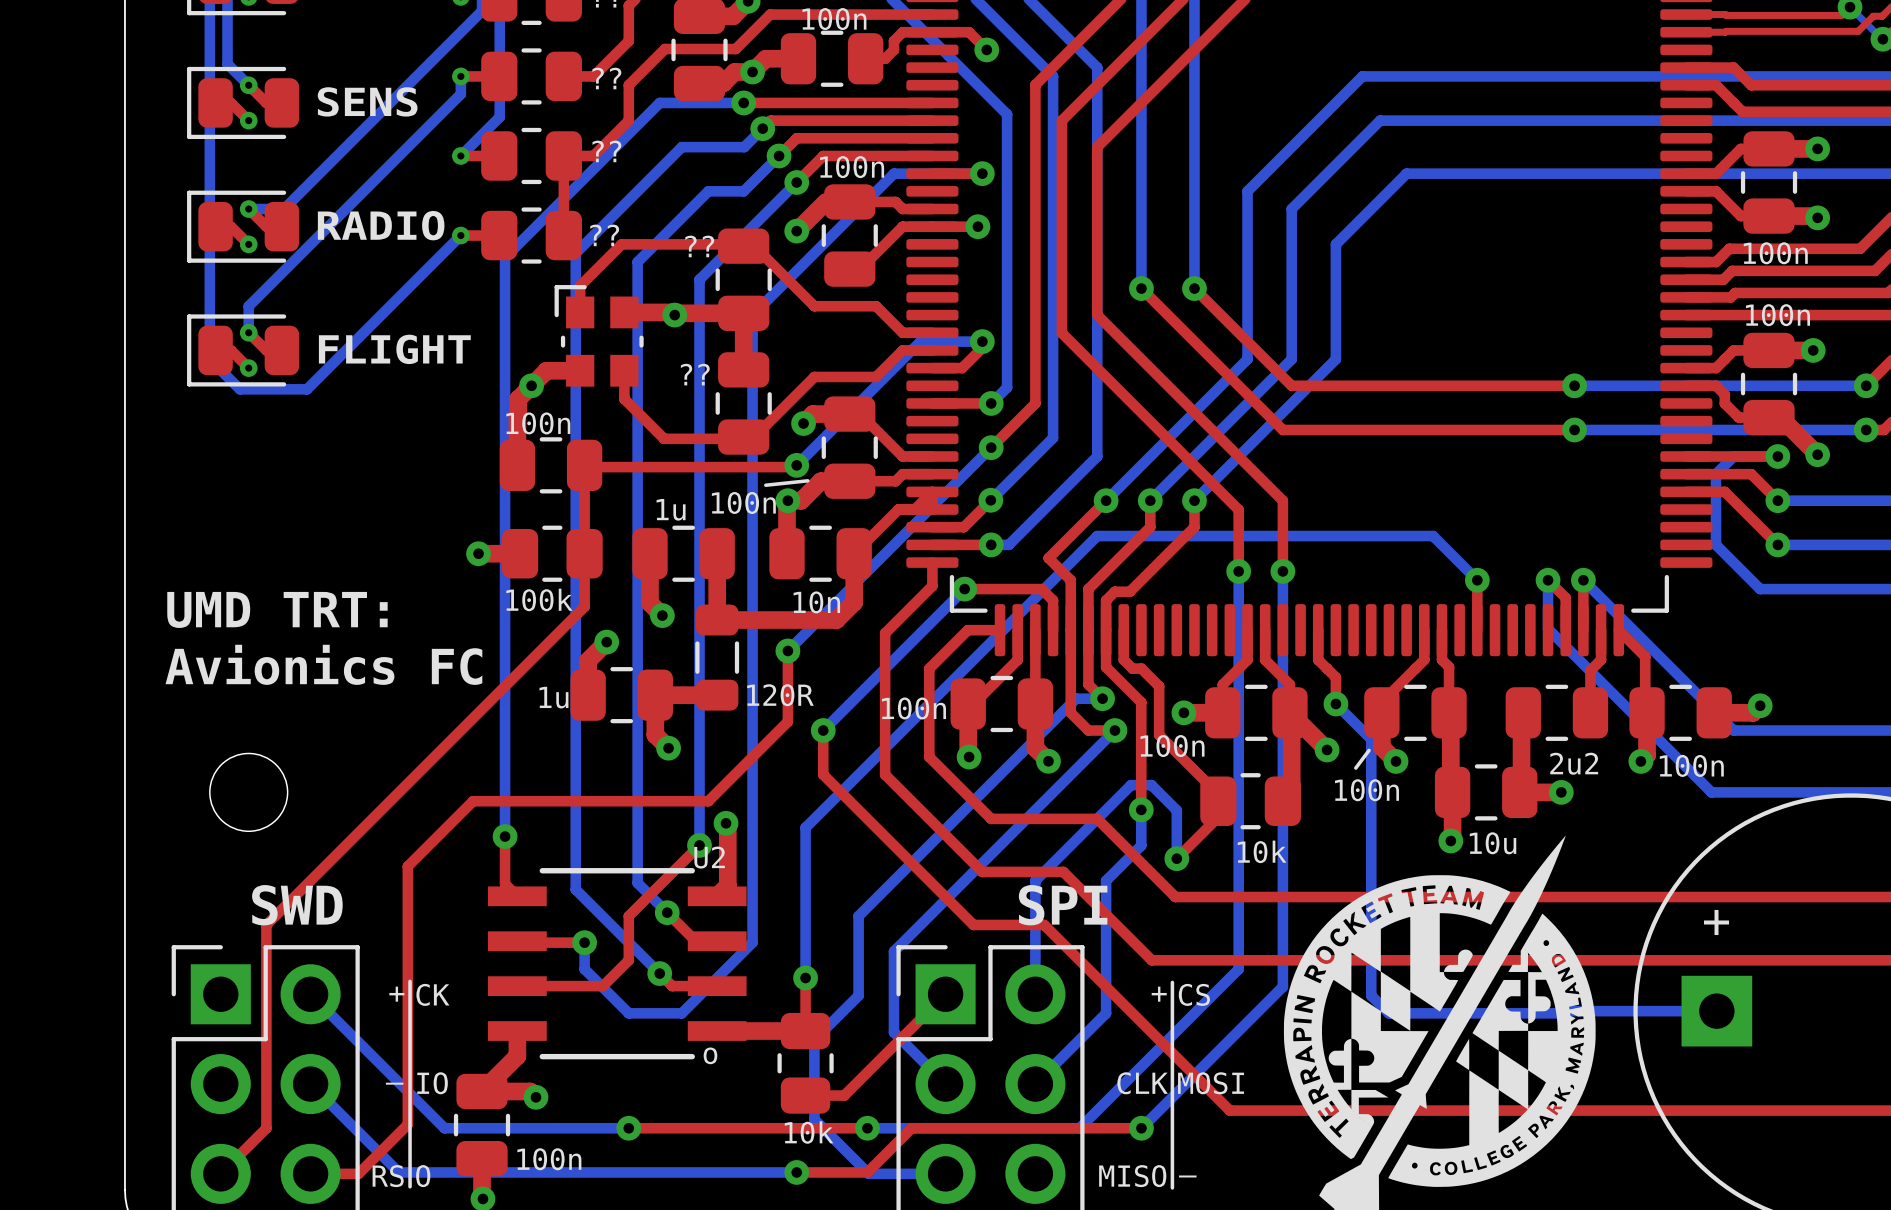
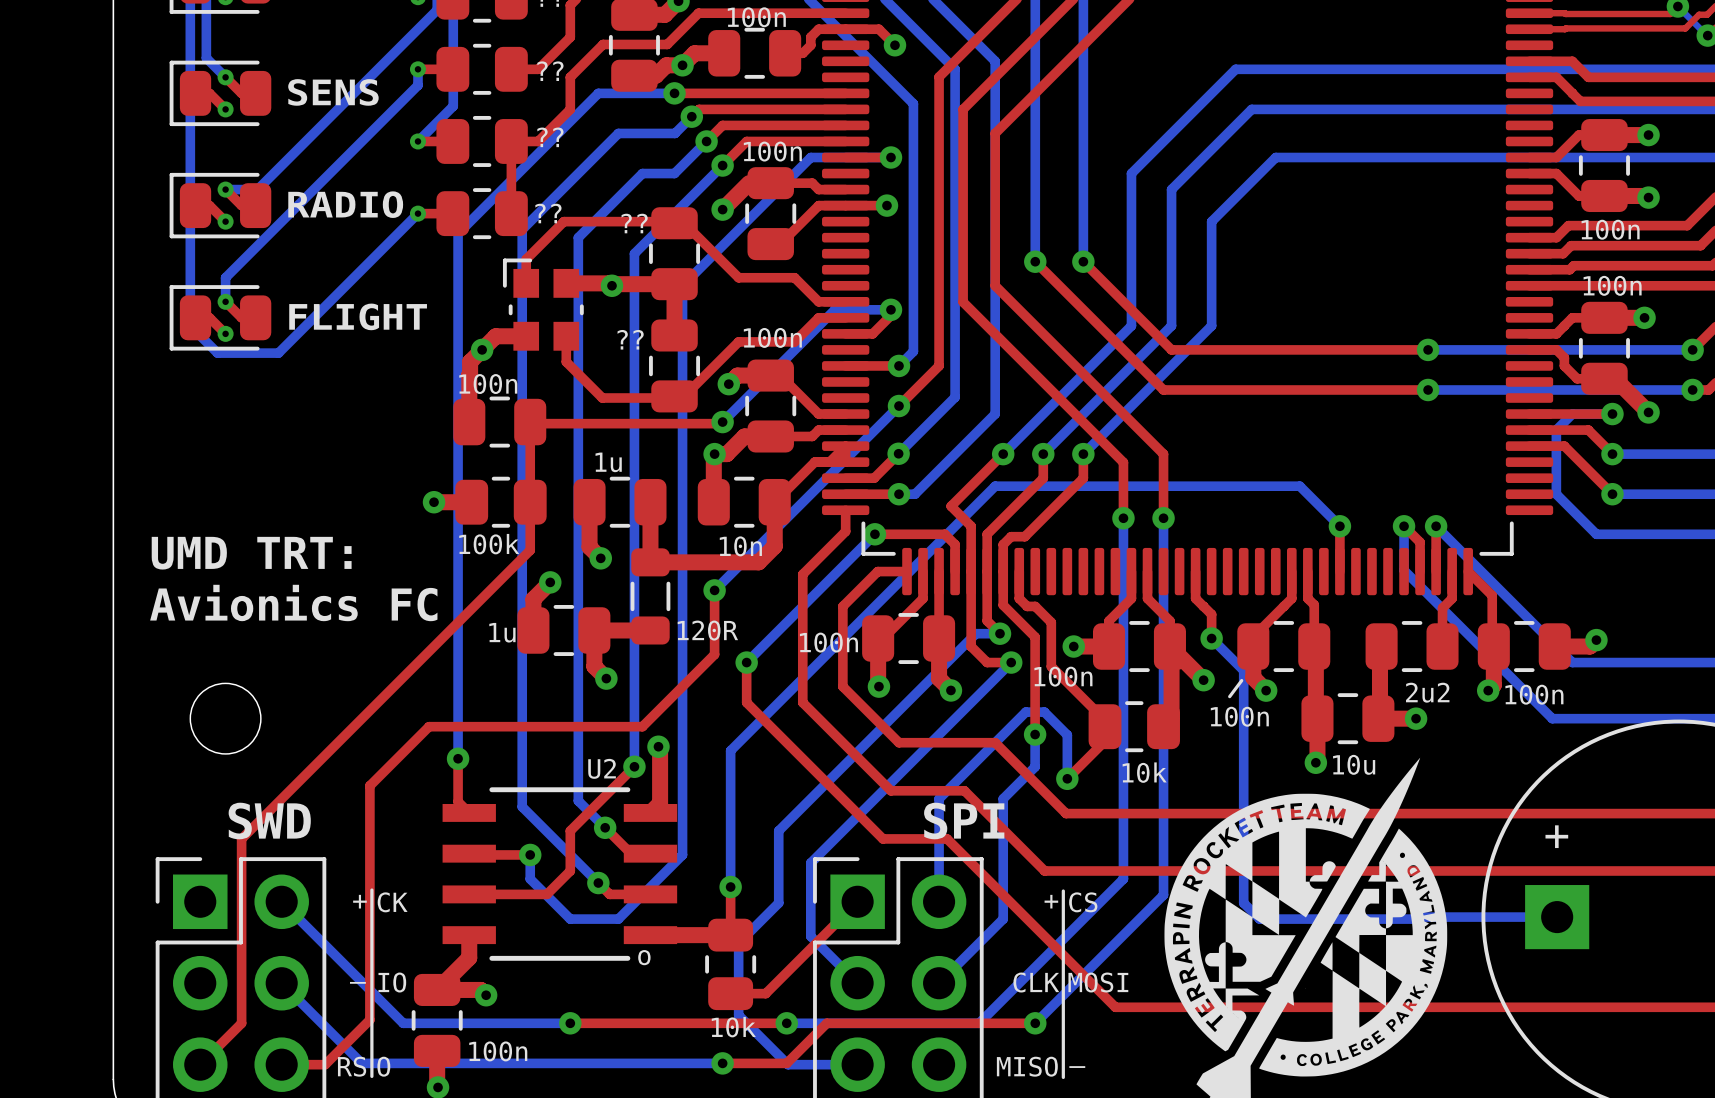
line: (807, 480) (765, 485) -> none
text position: 100n (743, 502) -> 100n (772, 337)
text position: U2 (709, 857) -> U2 (602, 768)

